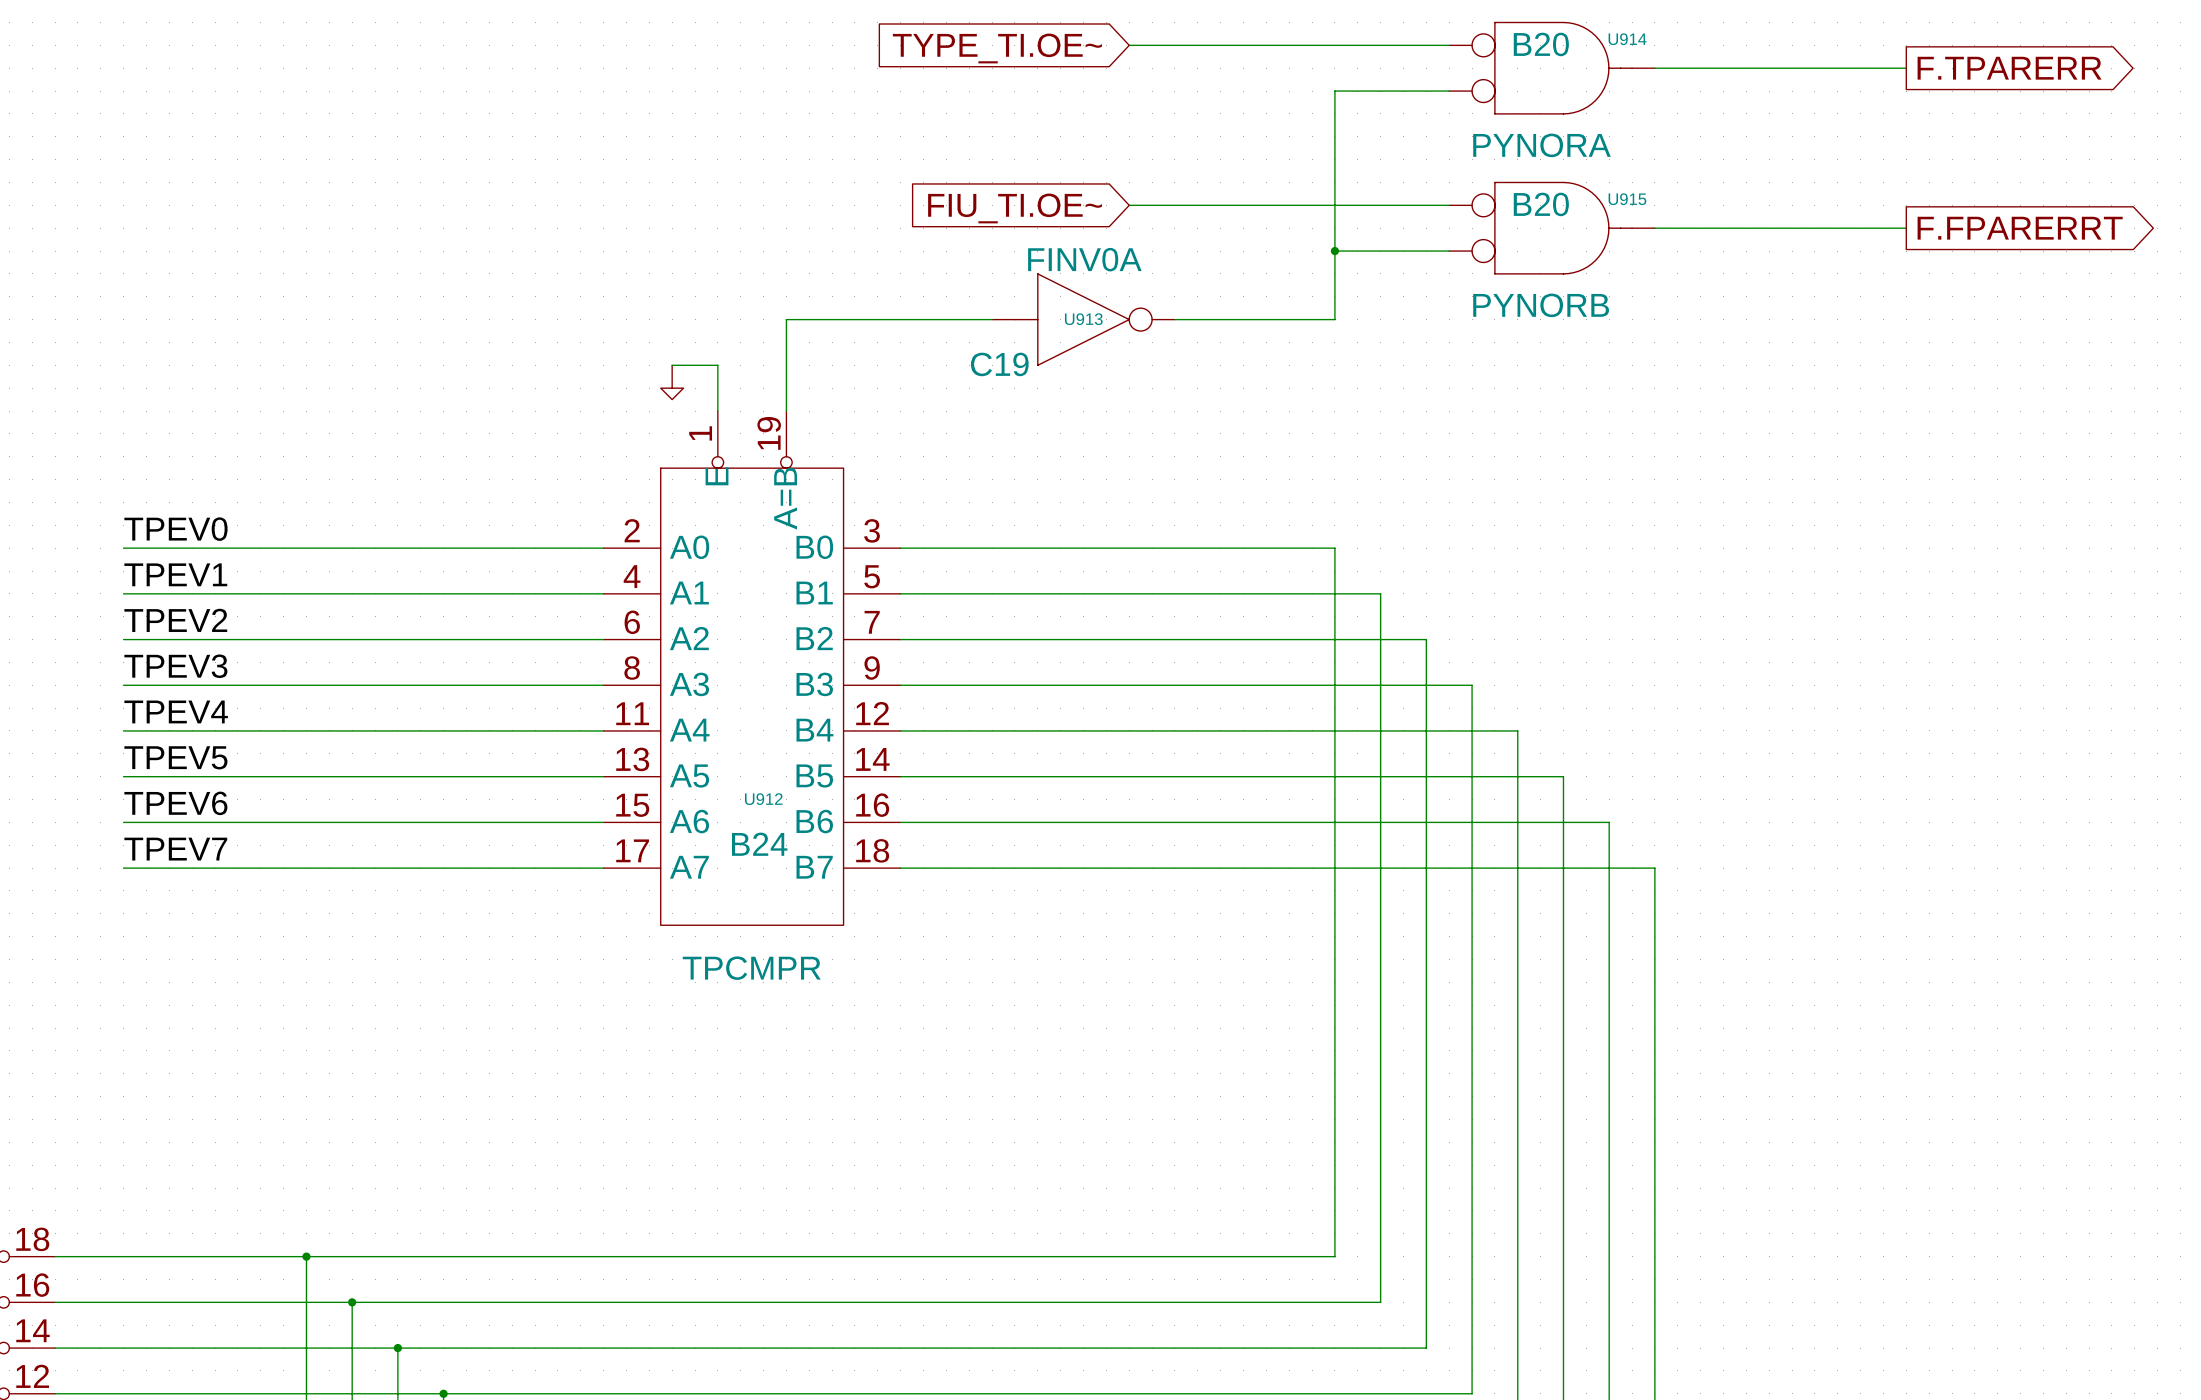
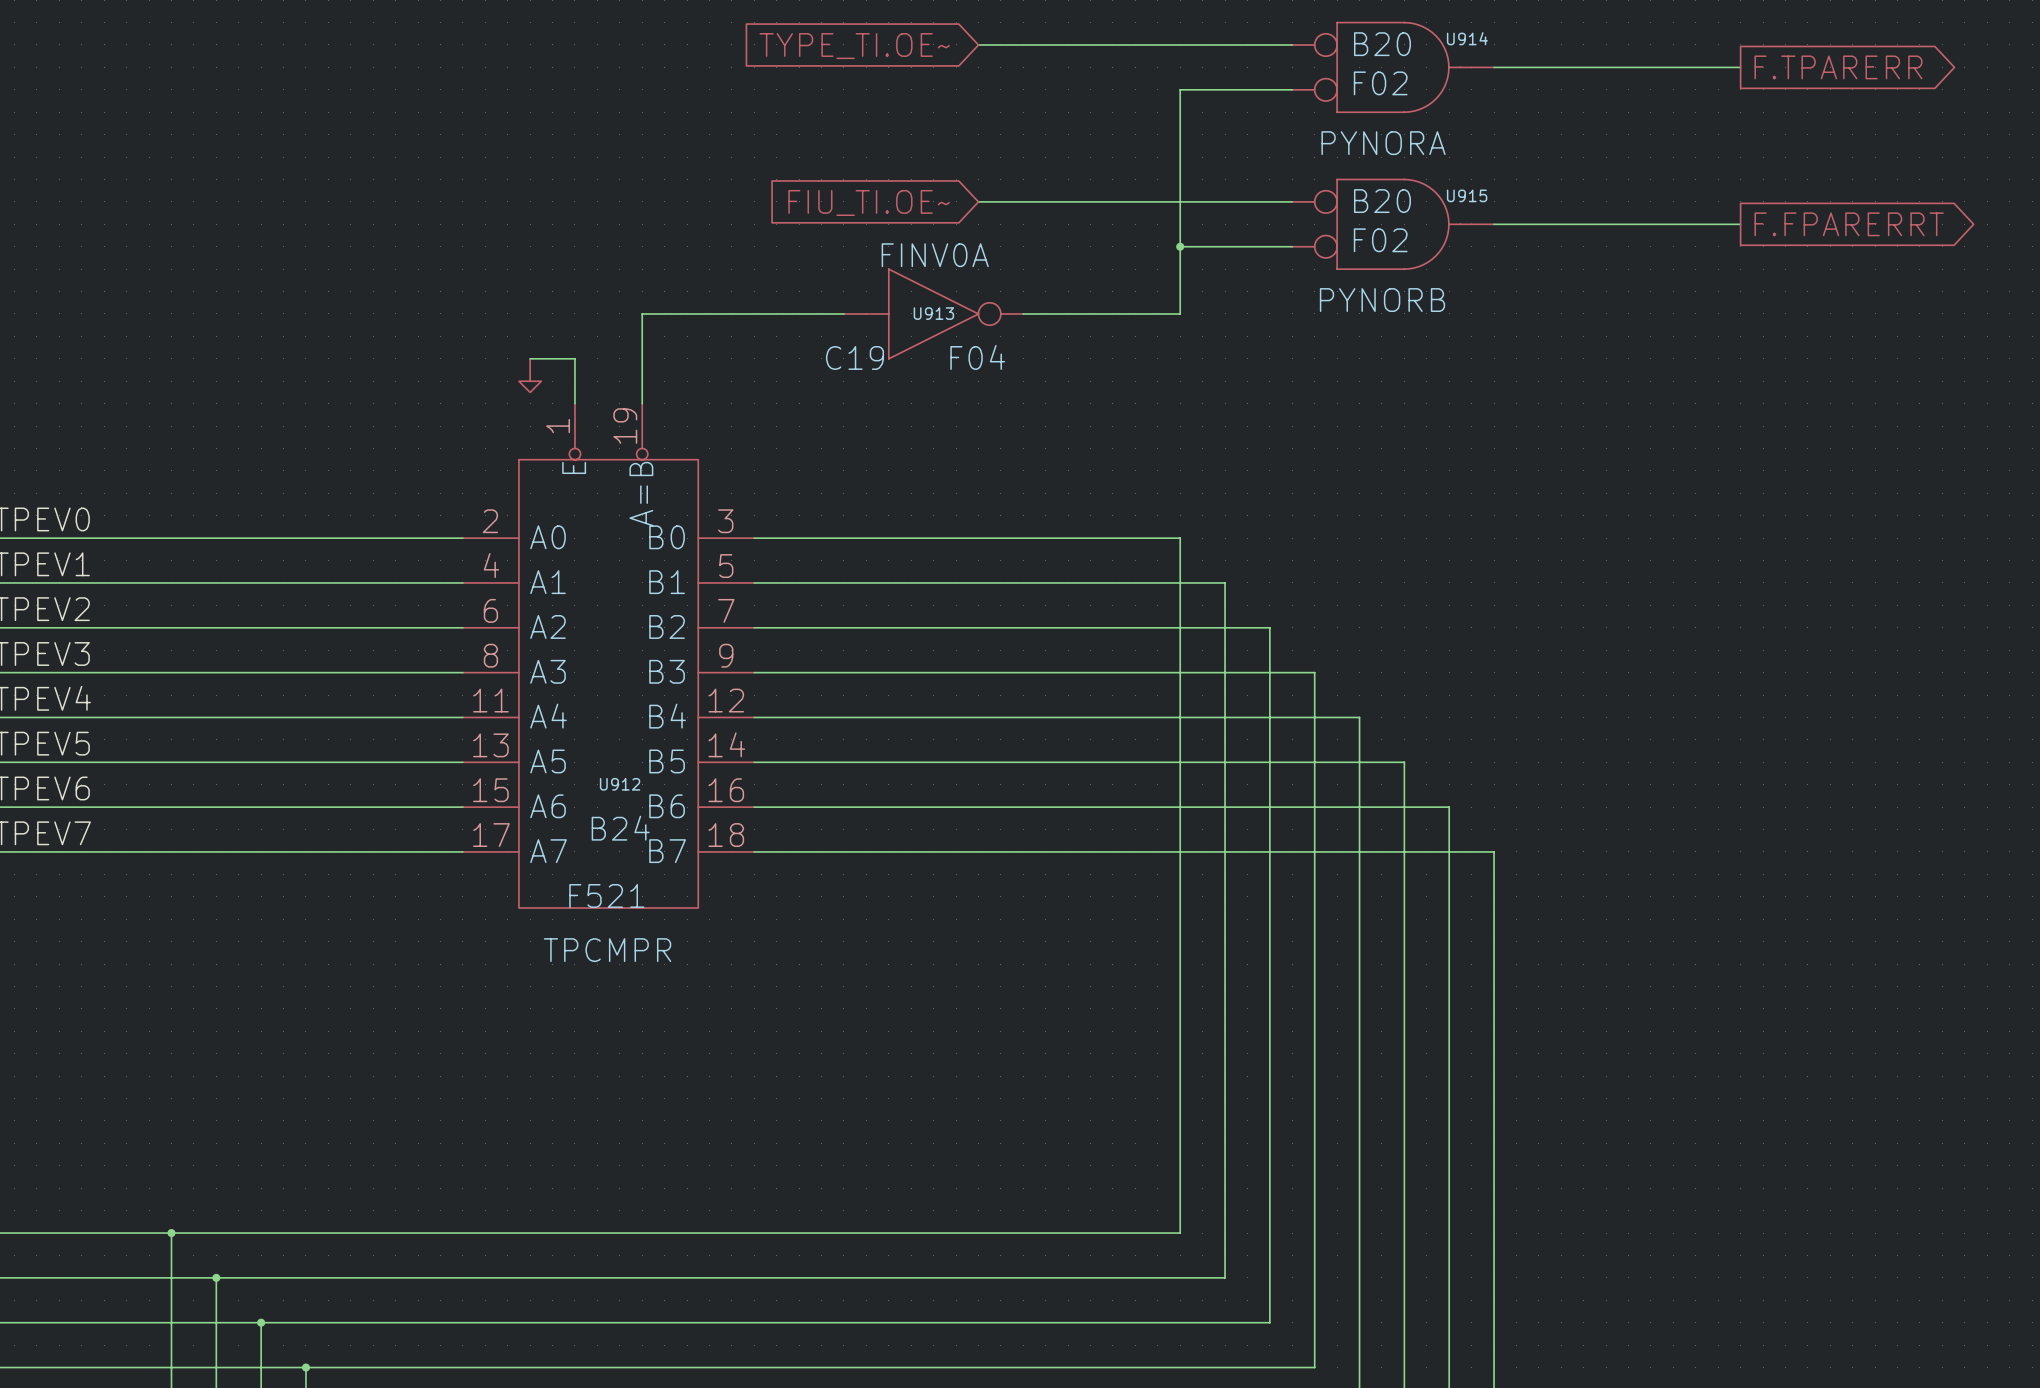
U914 value: none -> F02 (1380, 83)
U915 value: none -> F02 (1380, 240)
U913 value: none -> F04 (977, 357)
U912 value: none -> F521 (606, 895)

